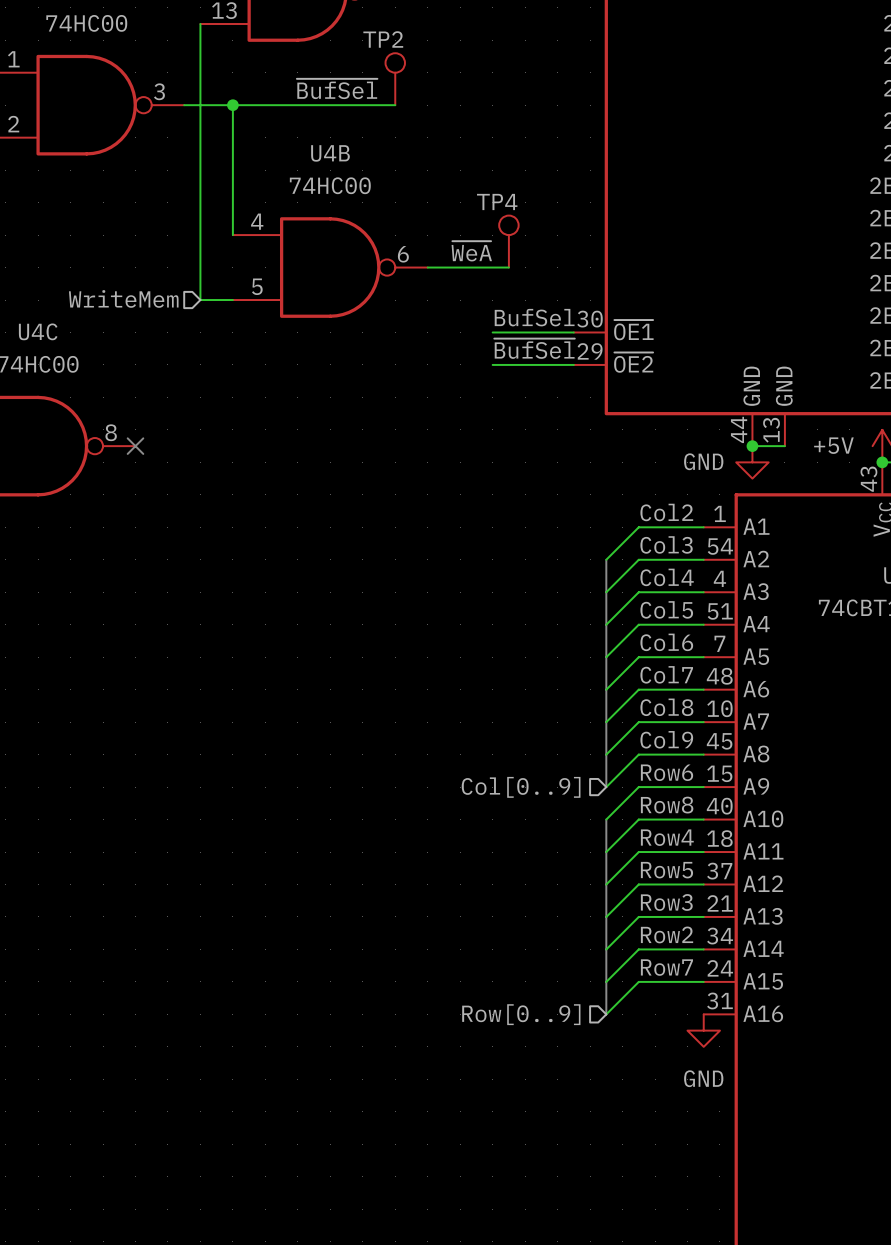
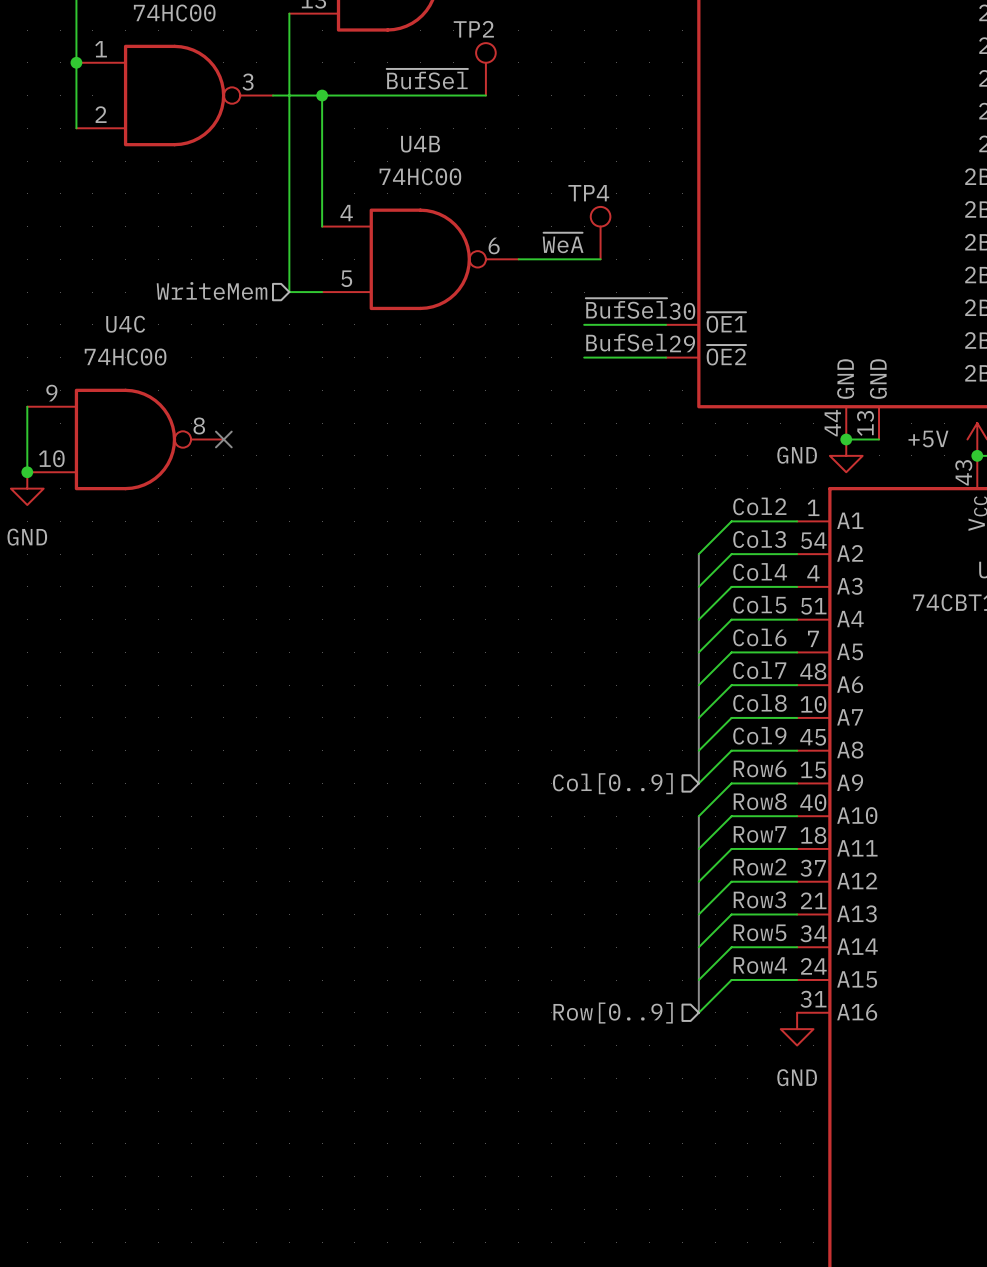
label: BufSel (534, 317) -> ~{BufSel} (626, 308)
label: ~{BufSel} (534, 348) -> BufSel (626, 342)
label: Row4 (667, 837) -> Row7 (760, 834)
label: Row5 (666, 870) -> Row2 (760, 867)
label: Row2 (667, 934) -> Row5 (760, 932)
label: Row7 (666, 967) -> Row4 (760, 965)

